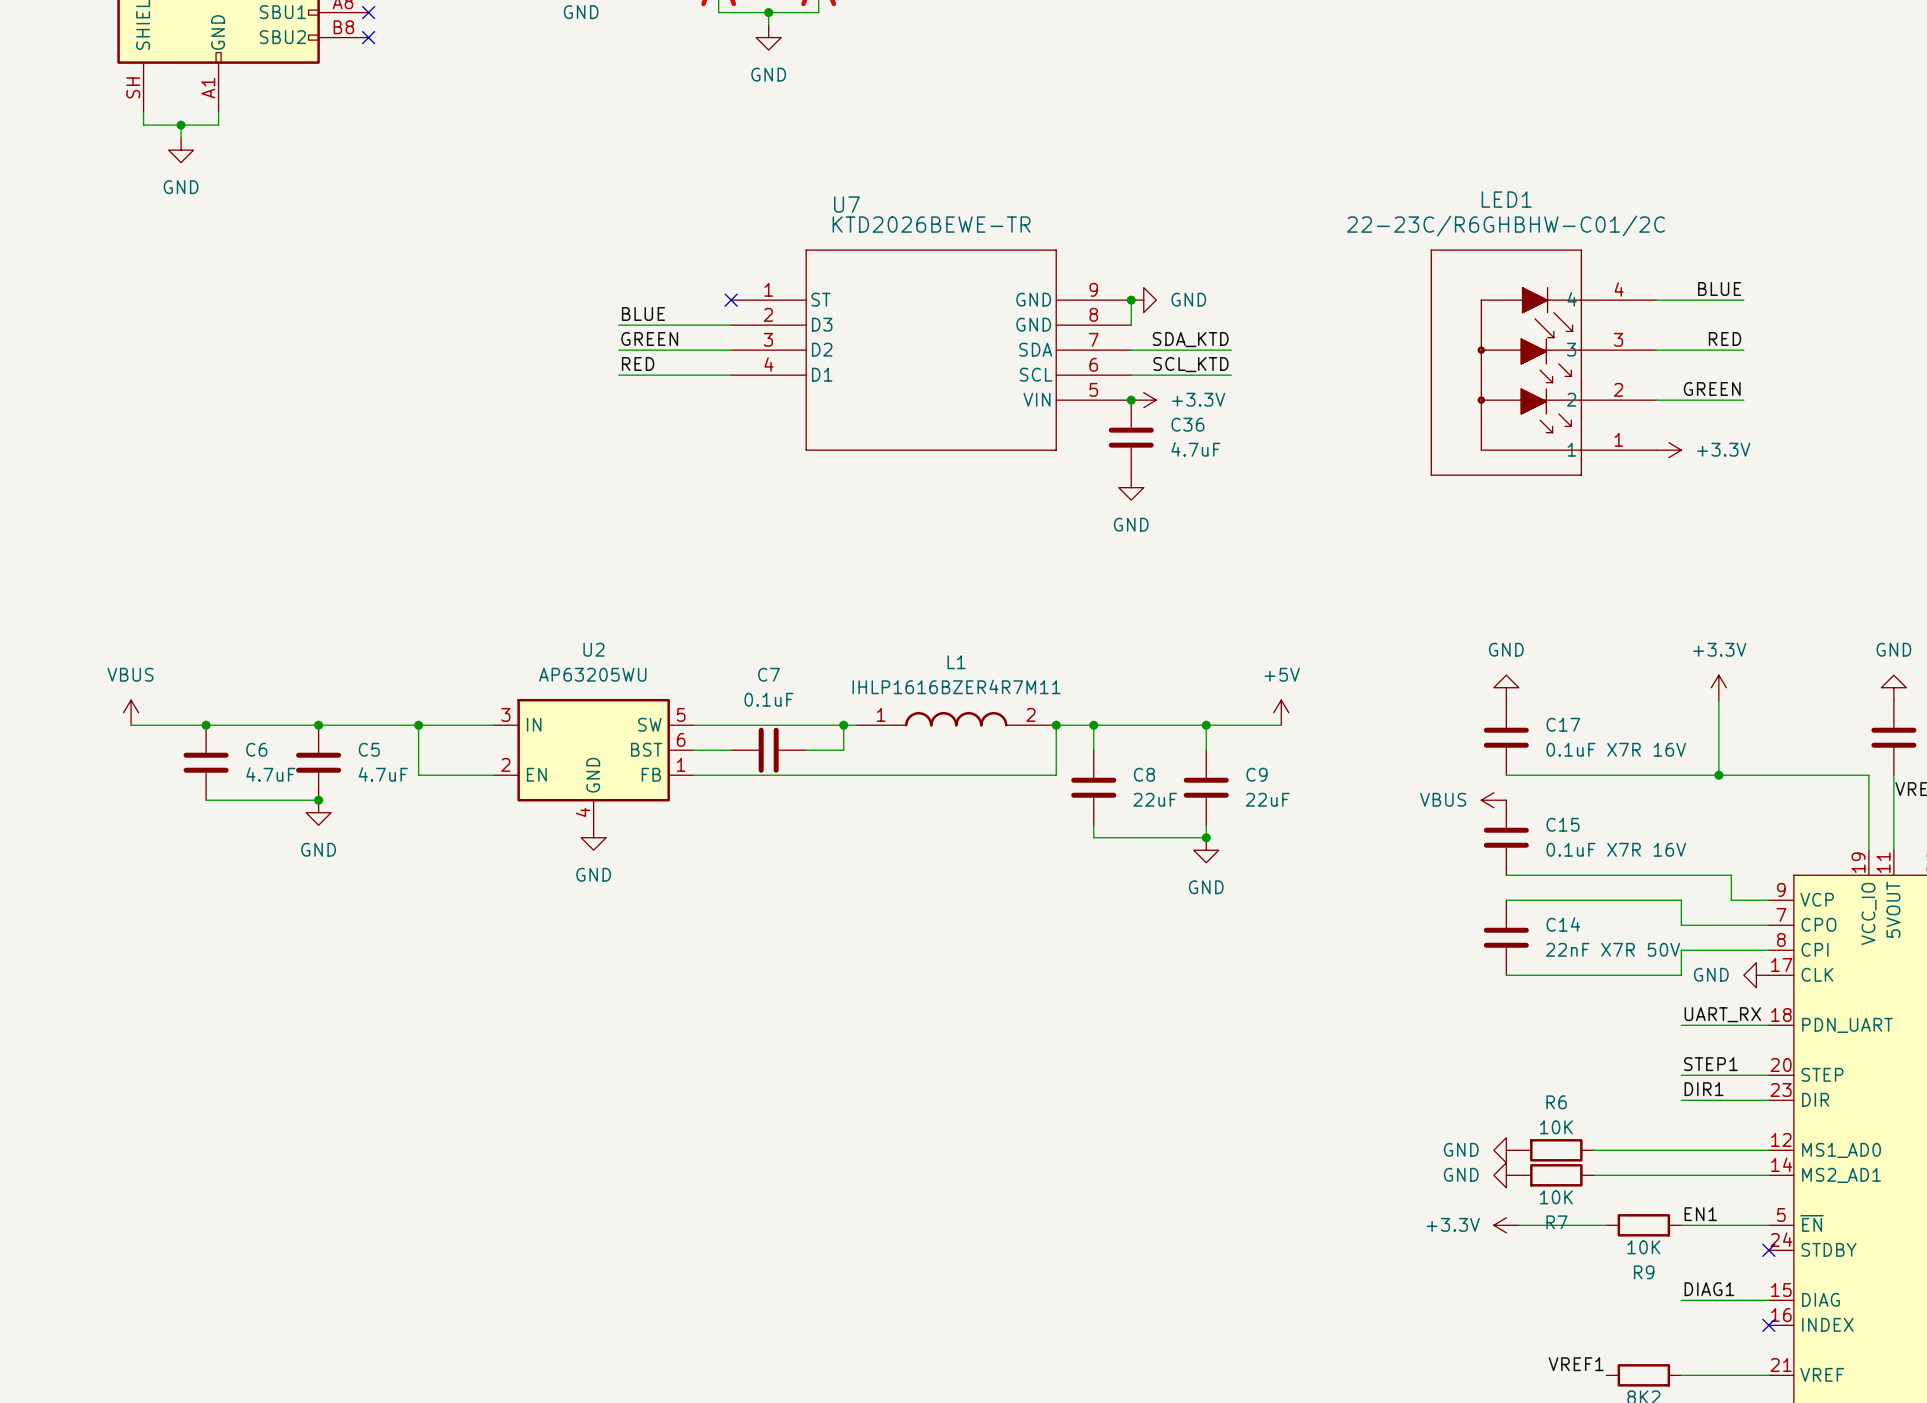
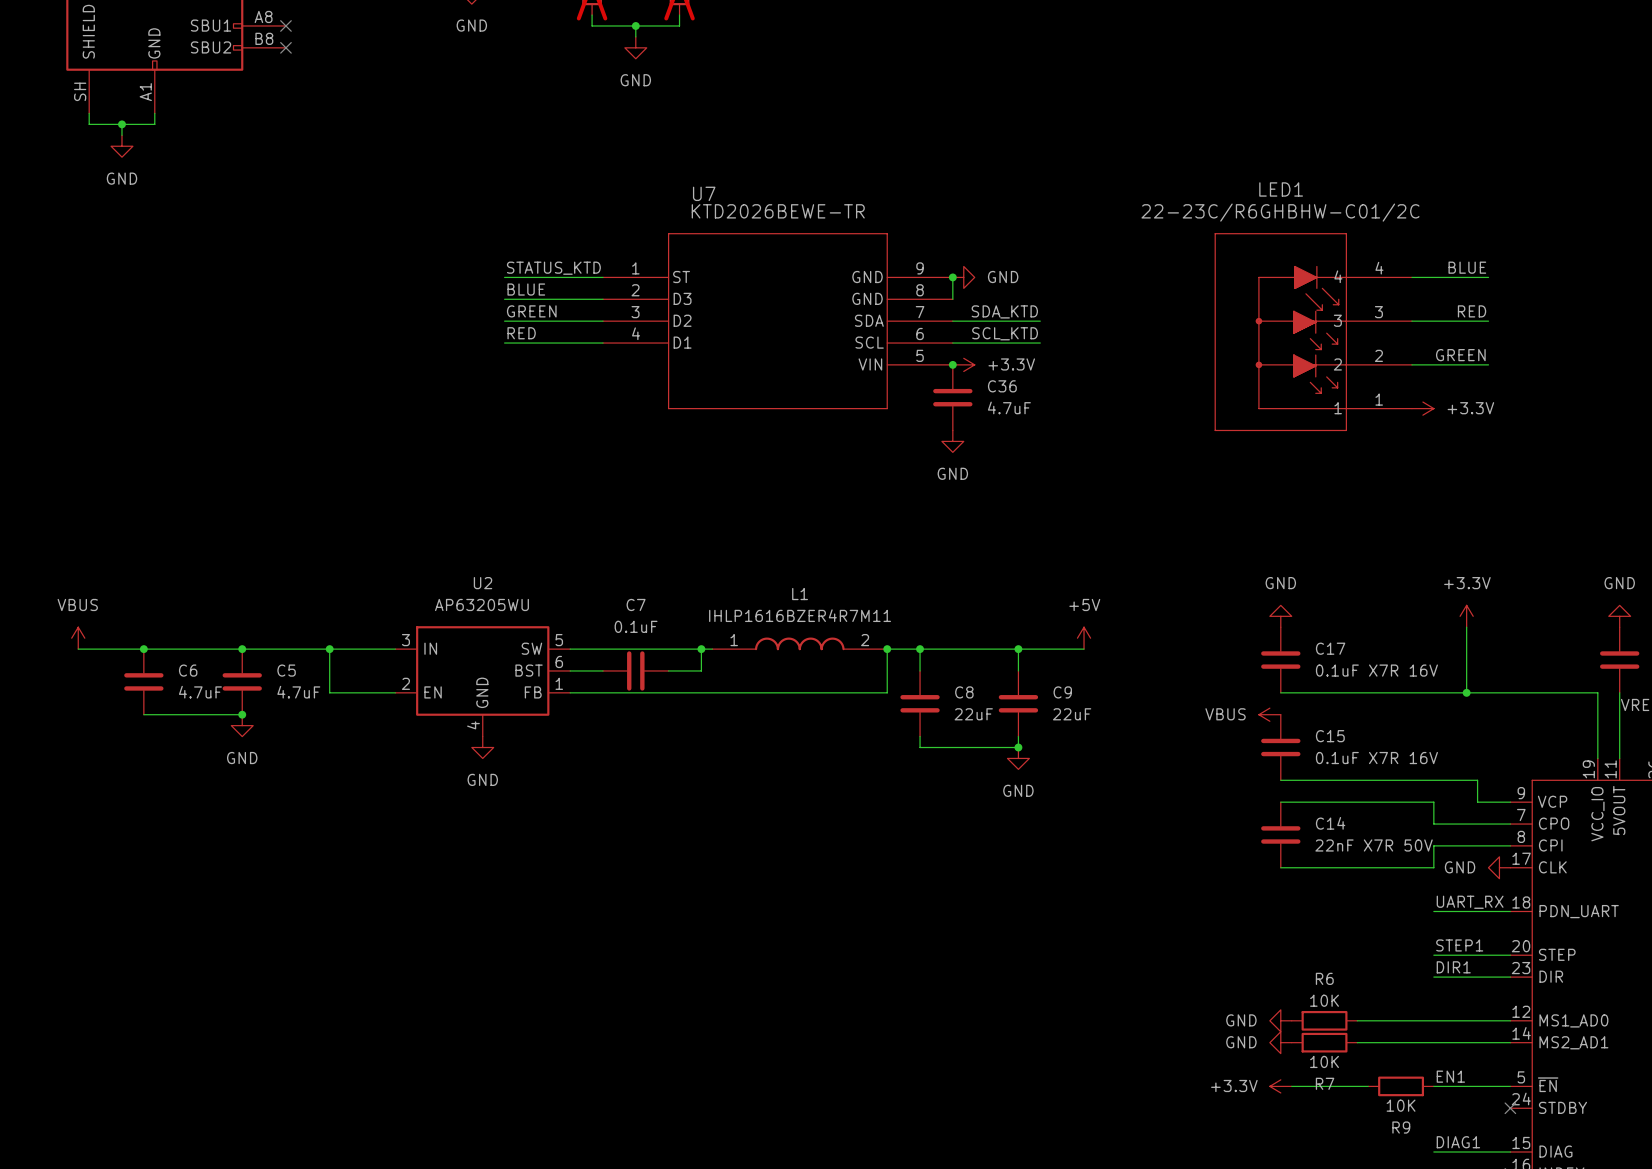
label: none -> STATUS_KTD (553, 268)
wire: none -> (504, 277) (603, 277)
no-connect mark: (731, 300) -> none

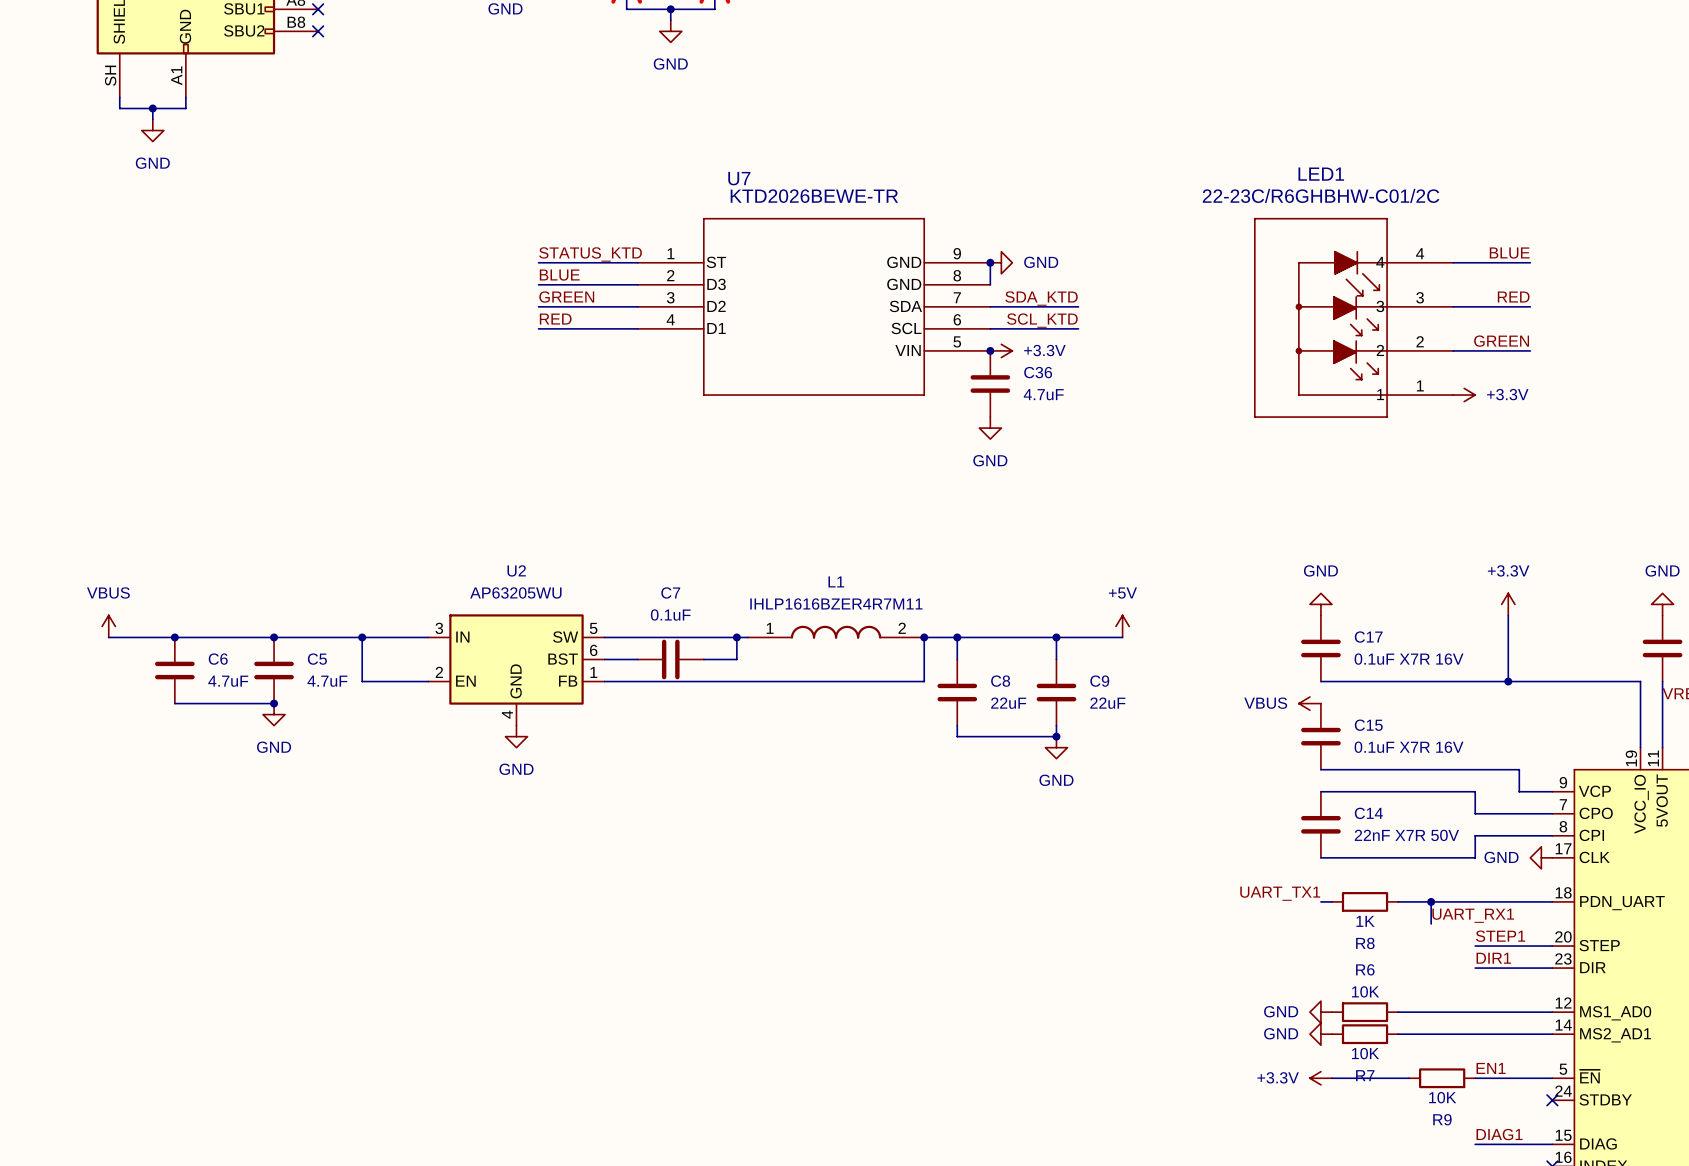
label: none -> UART_TX1 (1280, 893)
label: UART_RX (1470, 902) -> UART_RX1 (1473, 915)
wire: none -> (1320, 901) (1331, 901)
R8: none -> 1K (1365, 901)
wire: none -> (1398, 901) (1475, 901)
wire: none -> (1431, 901) (1431, 923)
junction: none -> (1431, 901)

